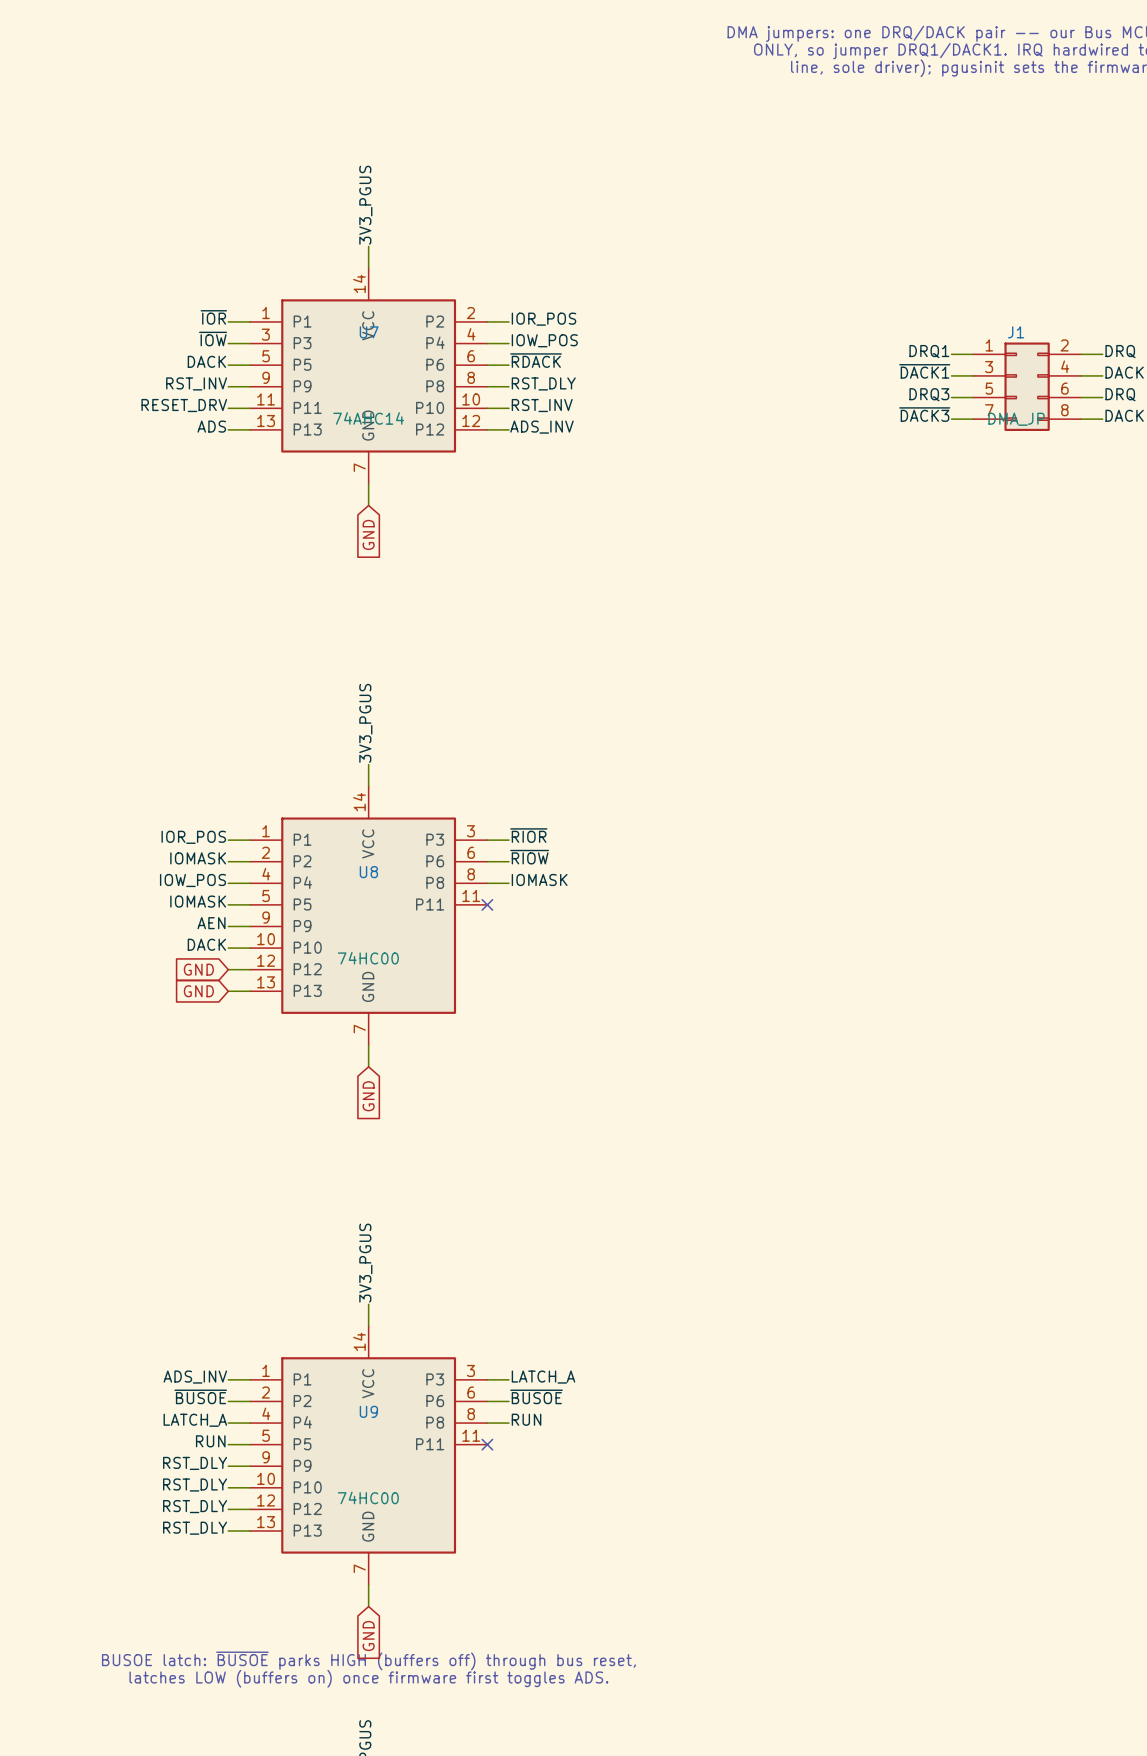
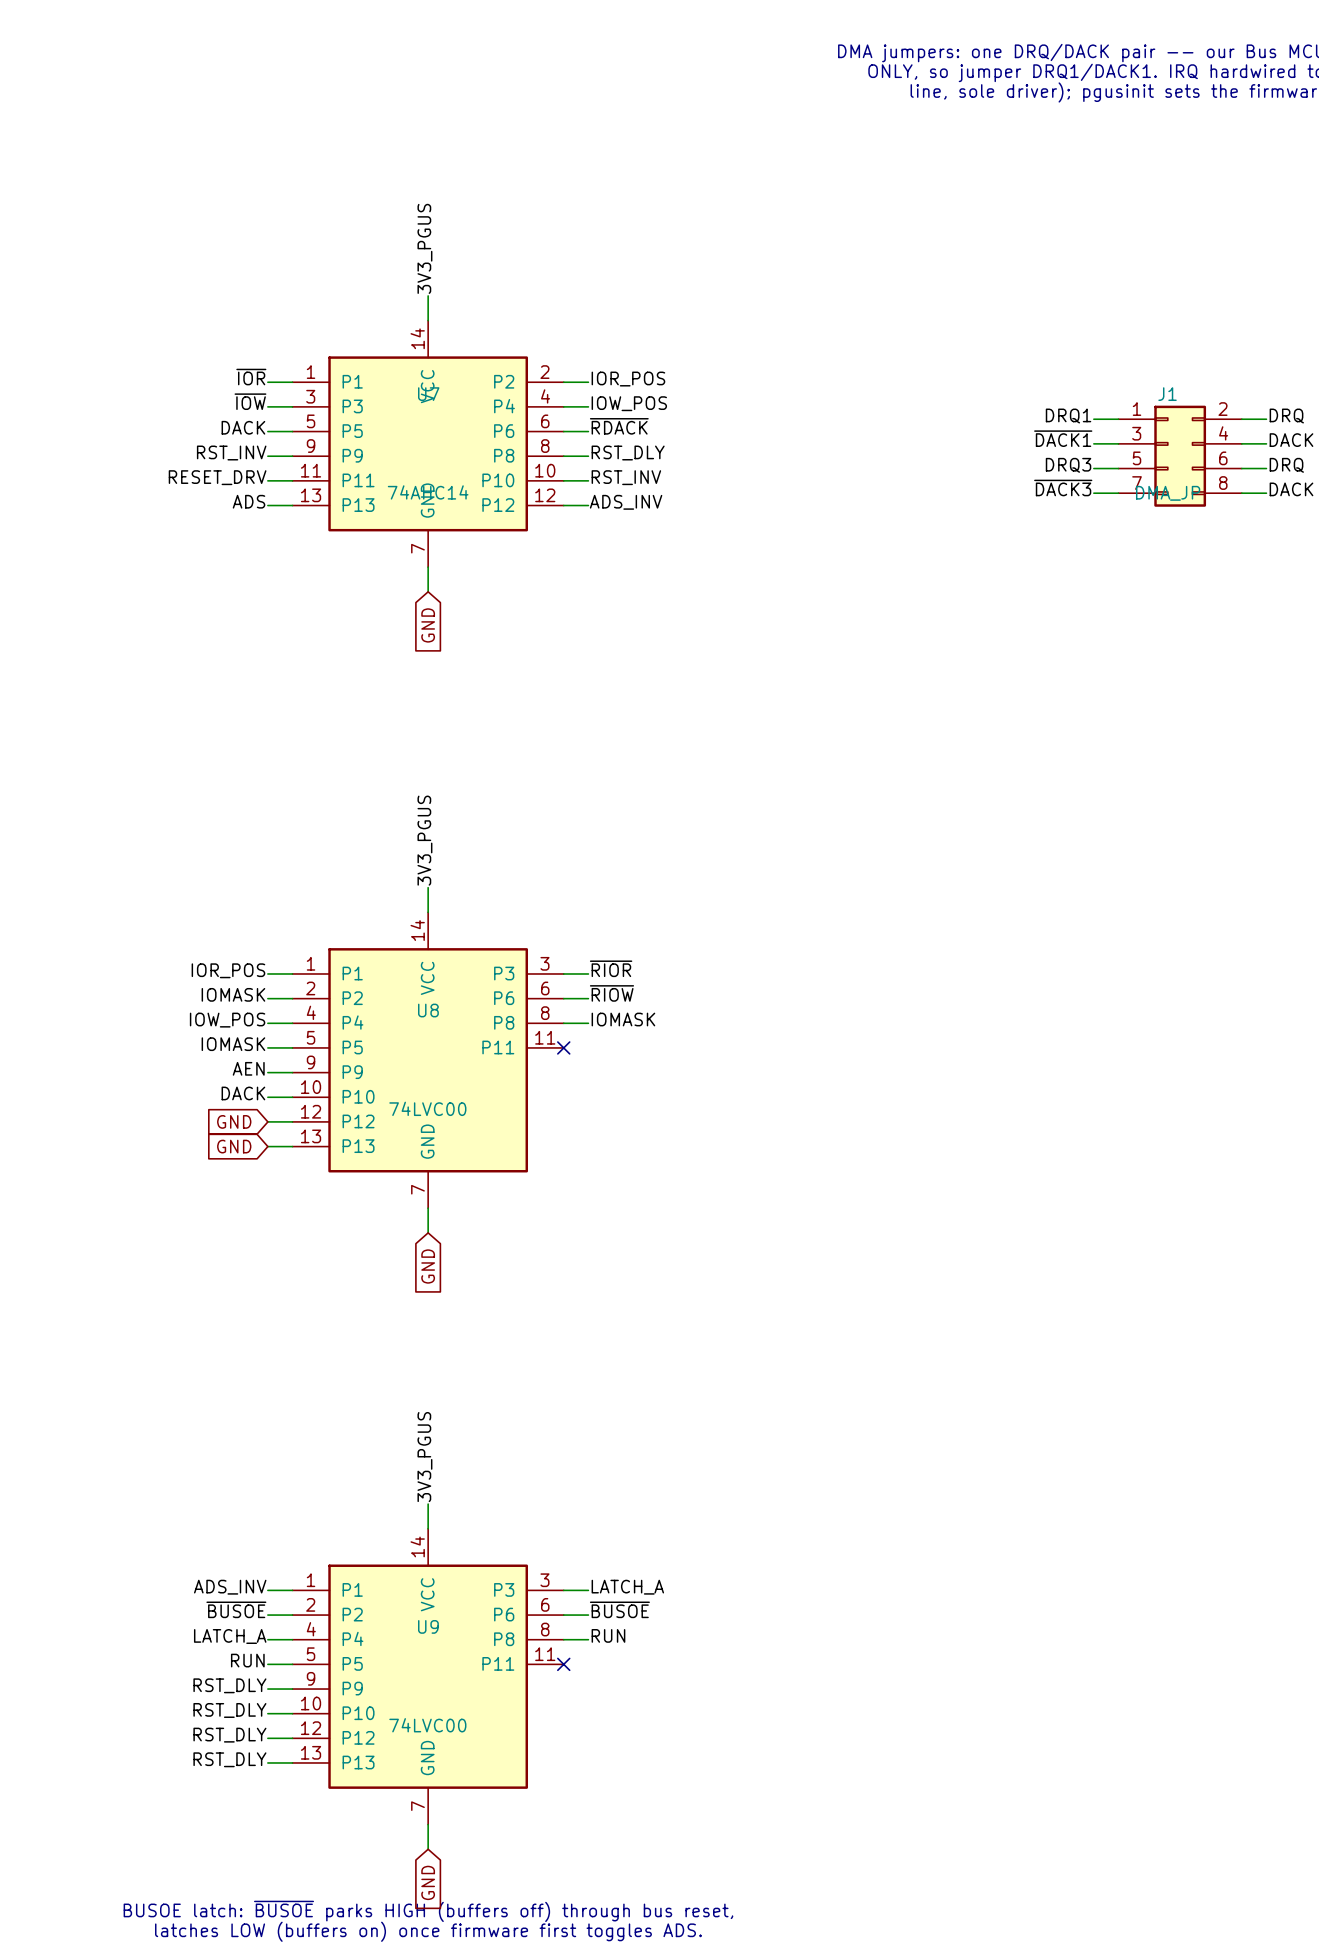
U8 value: 74HC00 (368, 958) -> 74LVC00 (427, 1108)
U9 value: 74HC00 (368, 1497) -> 74LVC00 (427, 1725)

